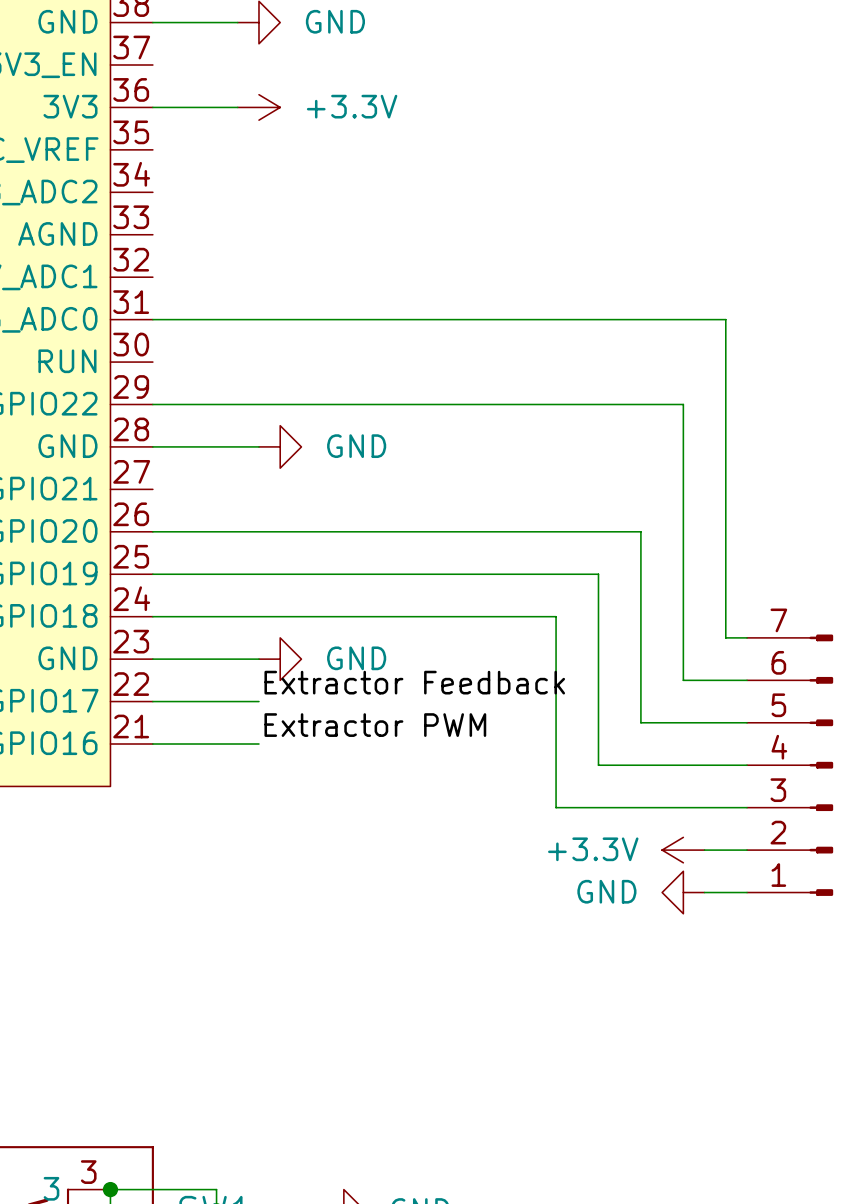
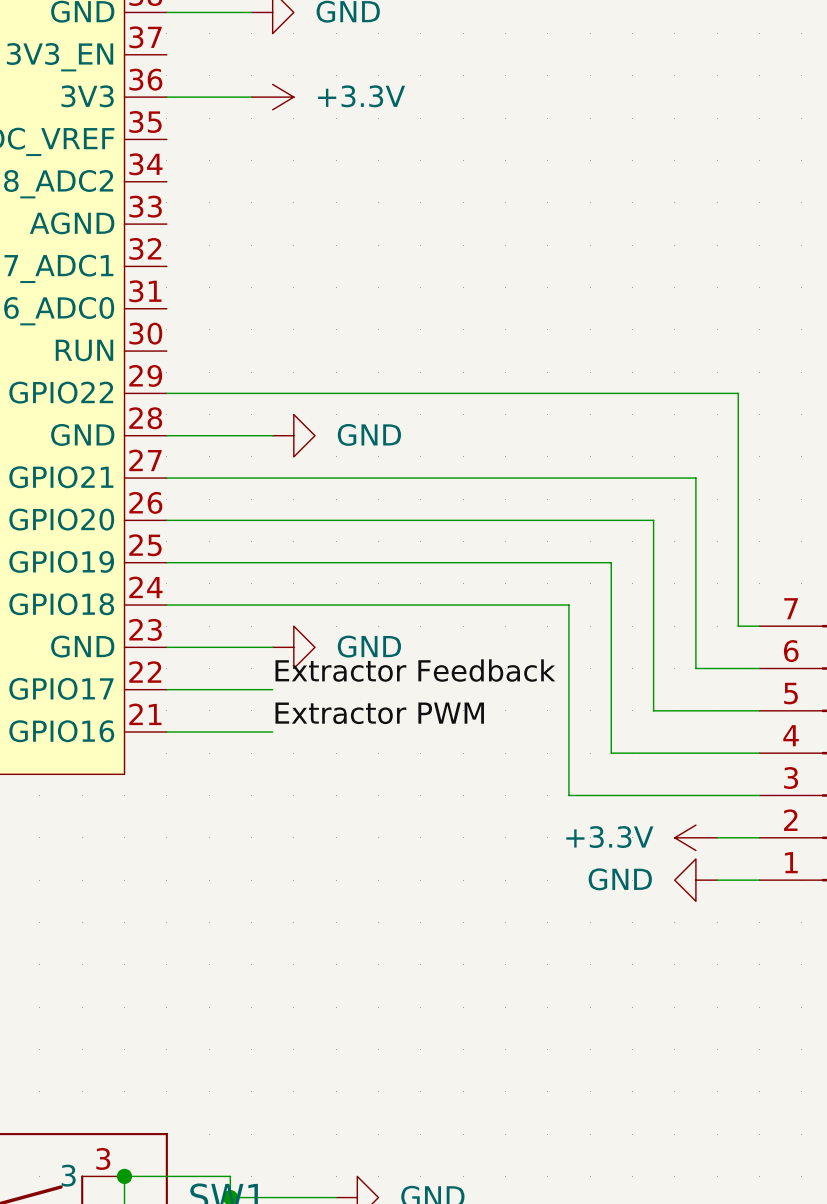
wire: (152, 319) (725, 319) (725, 404) -> none
wire: (683, 404) (683, 489) -> (695, 393) (738, 393)
wire: none -> (166, 478) (695, 478)

